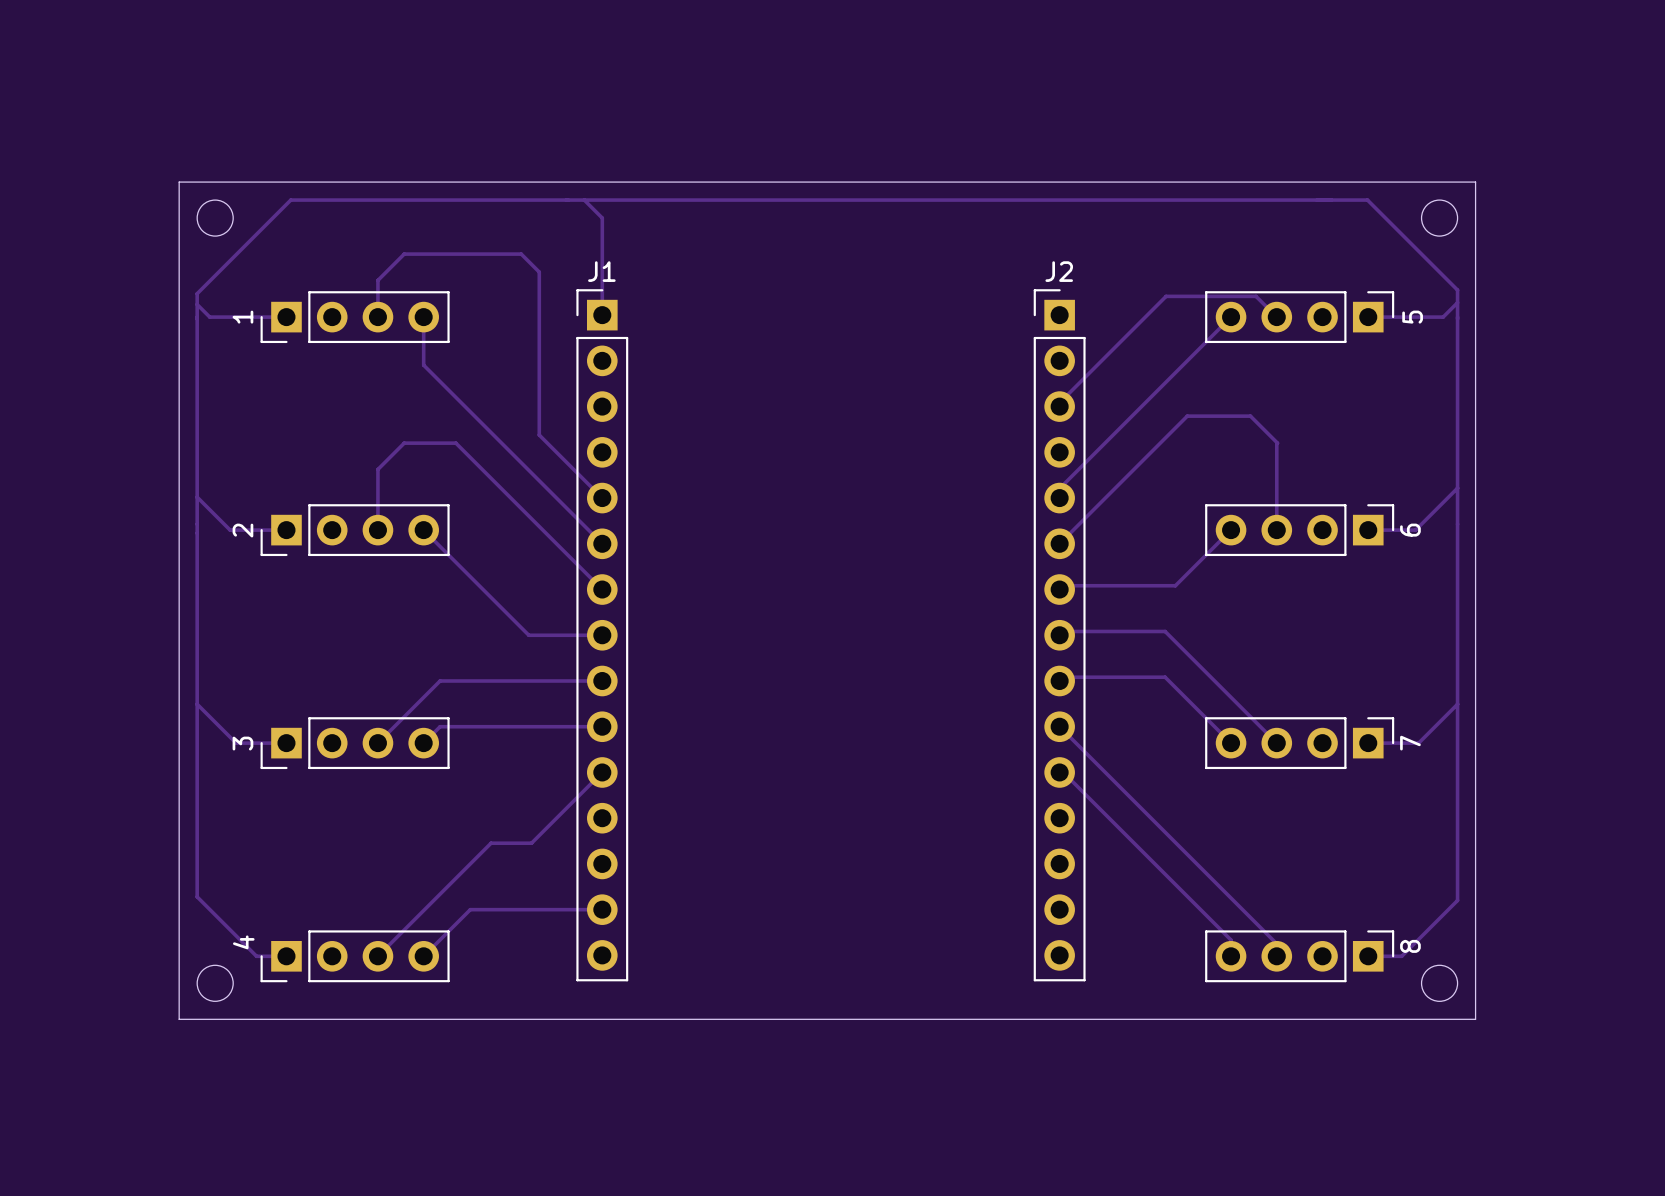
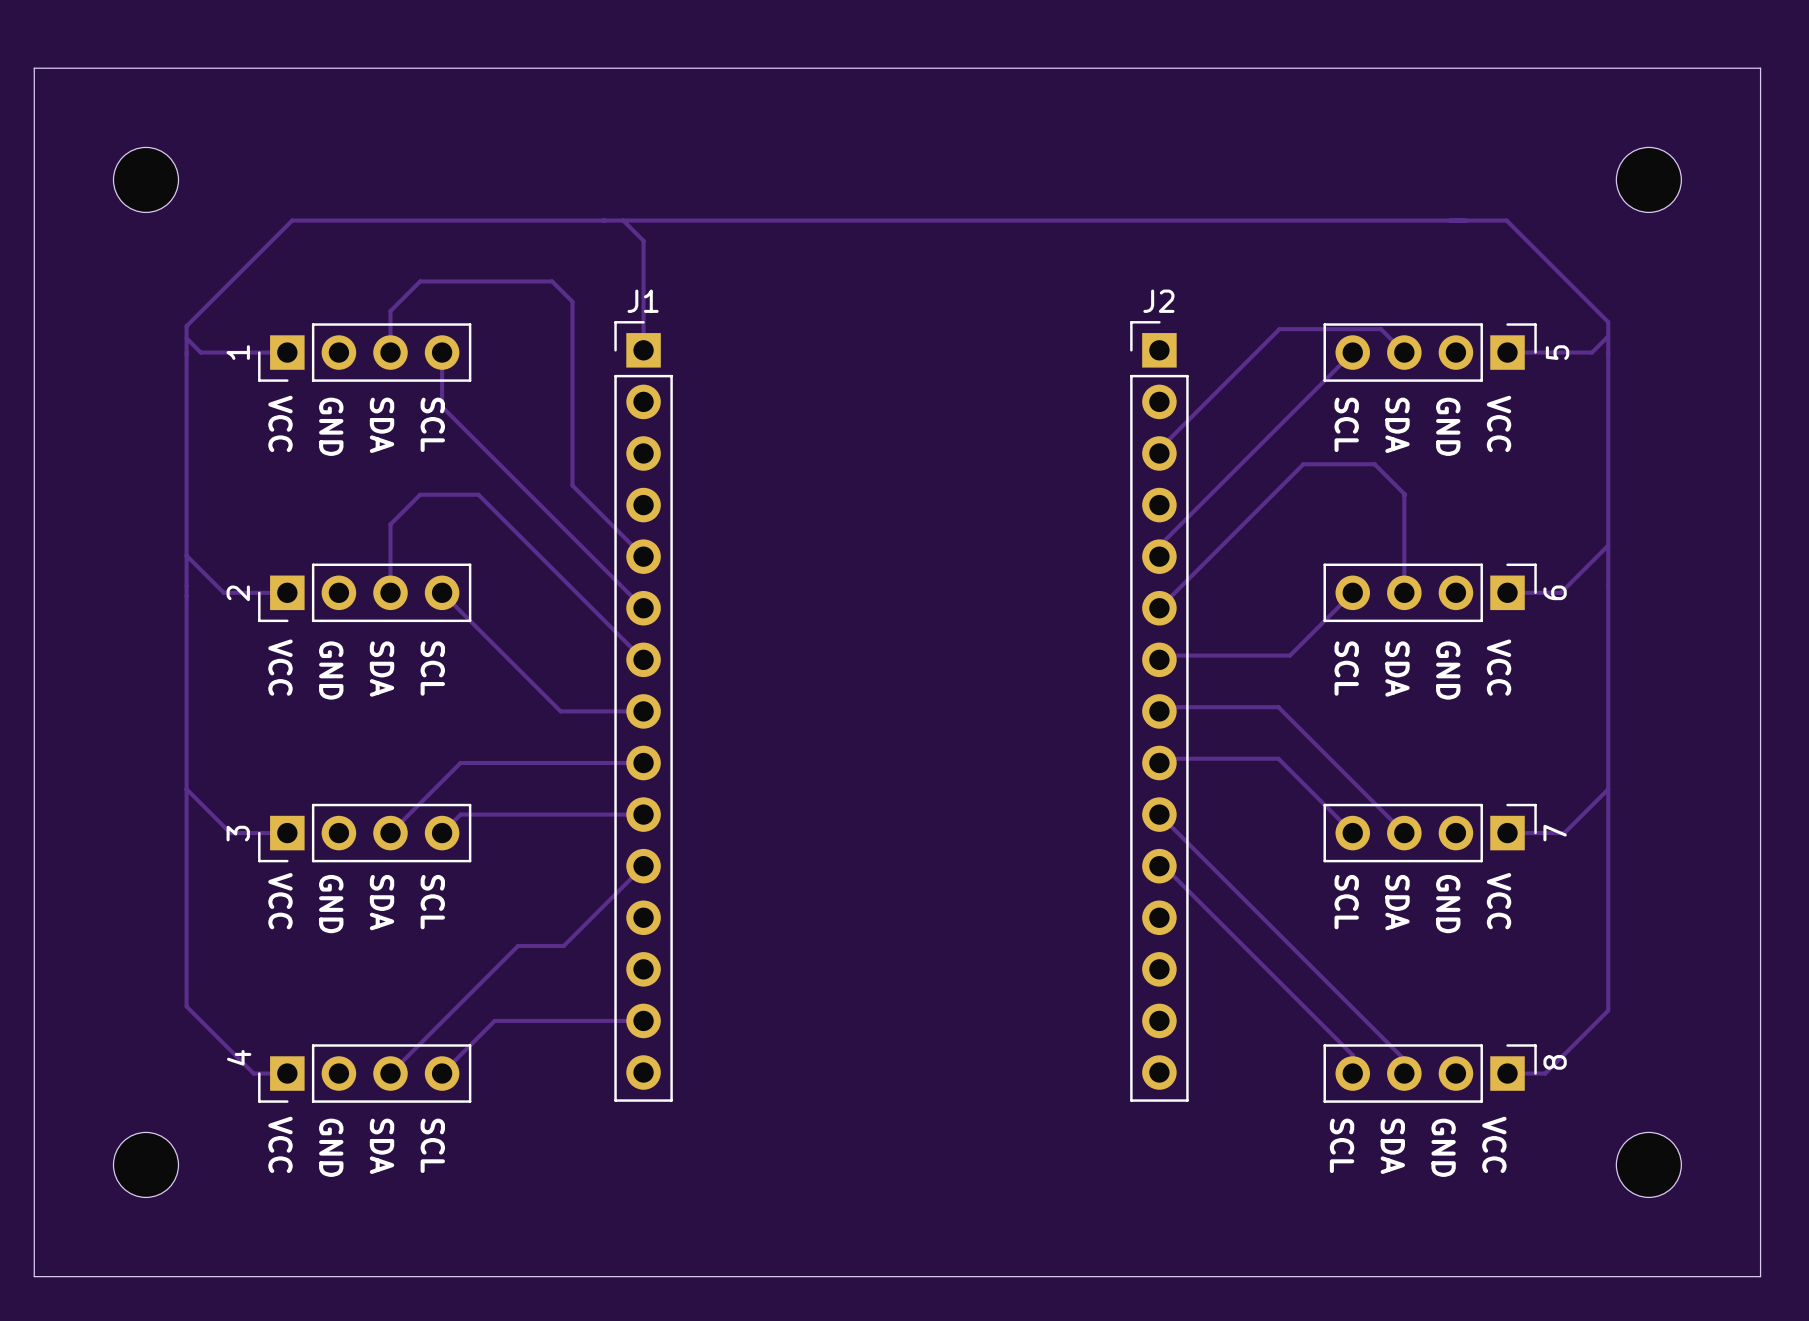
part: none -> (145, 179)
part: none -> (1648, 179)
board edge: (179, 182) (179, 1019) (1475, 1019) (1475, 182) (179, 182) -> (34, 68) (34, 1276) (1760, 1276) (1760, 68) (34, 68)
round board edge: [196, 199, 234, 237] -> none
round board edge: [1421, 199, 1459, 237] -> none
text: none -> VCC (280, 423)
text: none -> VCC (1499, 423)
text: none -> SDA (382, 425)
text: none -> SCL (432, 424)
text: none -> SCL (1346, 424)
text: none -> SDA (1397, 425)
text: none -> GND (331, 426)
text: none -> GND (1448, 426)
text: none -> VCC (280, 667)
text: none -> VCC (1499, 667)
text: none -> SDA (382, 669)
text: none -> SCL (432, 668)
text: none -> SCL (1346, 668)
text: none -> SDA (1397, 669)
text: none -> GND (331, 670)
text: none -> GND (1448, 670)
text: none -> VCC (280, 901)
text: none -> VCC (1499, 901)
text: none -> SDA (382, 902)
text: none -> SCL (432, 902)
text: none -> SCL (1346, 902)
text: none -> SDA (1397, 902)
text: none -> GND (331, 904)
text: none -> GND (1448, 904)
round board edge: [196, 964, 234, 1002] -> none
round board edge: [1421, 964, 1459, 1002] -> none
text: none -> VCC (280, 1144)
text: none -> VCC (1494, 1144)
text: none -> SDA (382, 1146)
text: none -> SCL (432, 1145)
text: none -> SCL (1342, 1145)
text: none -> SDA (1392, 1146)
text: none -> GND (331, 1147)
text: none -> GND (1443, 1147)
part: none -> (145, 1164)
part: none -> (1648, 1164)

